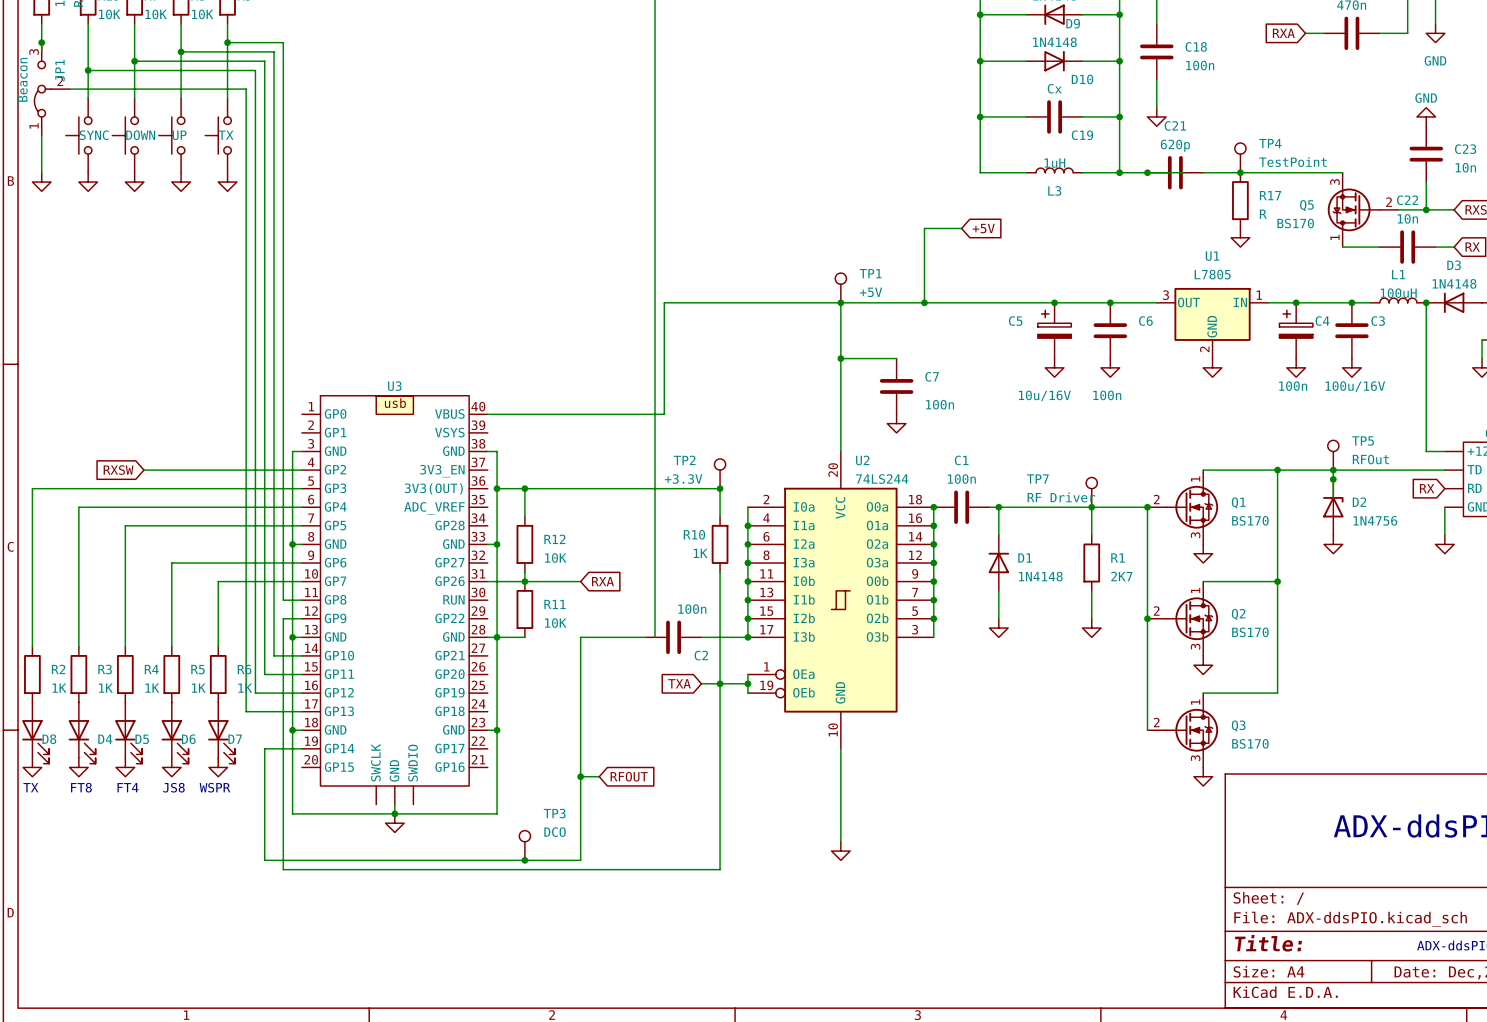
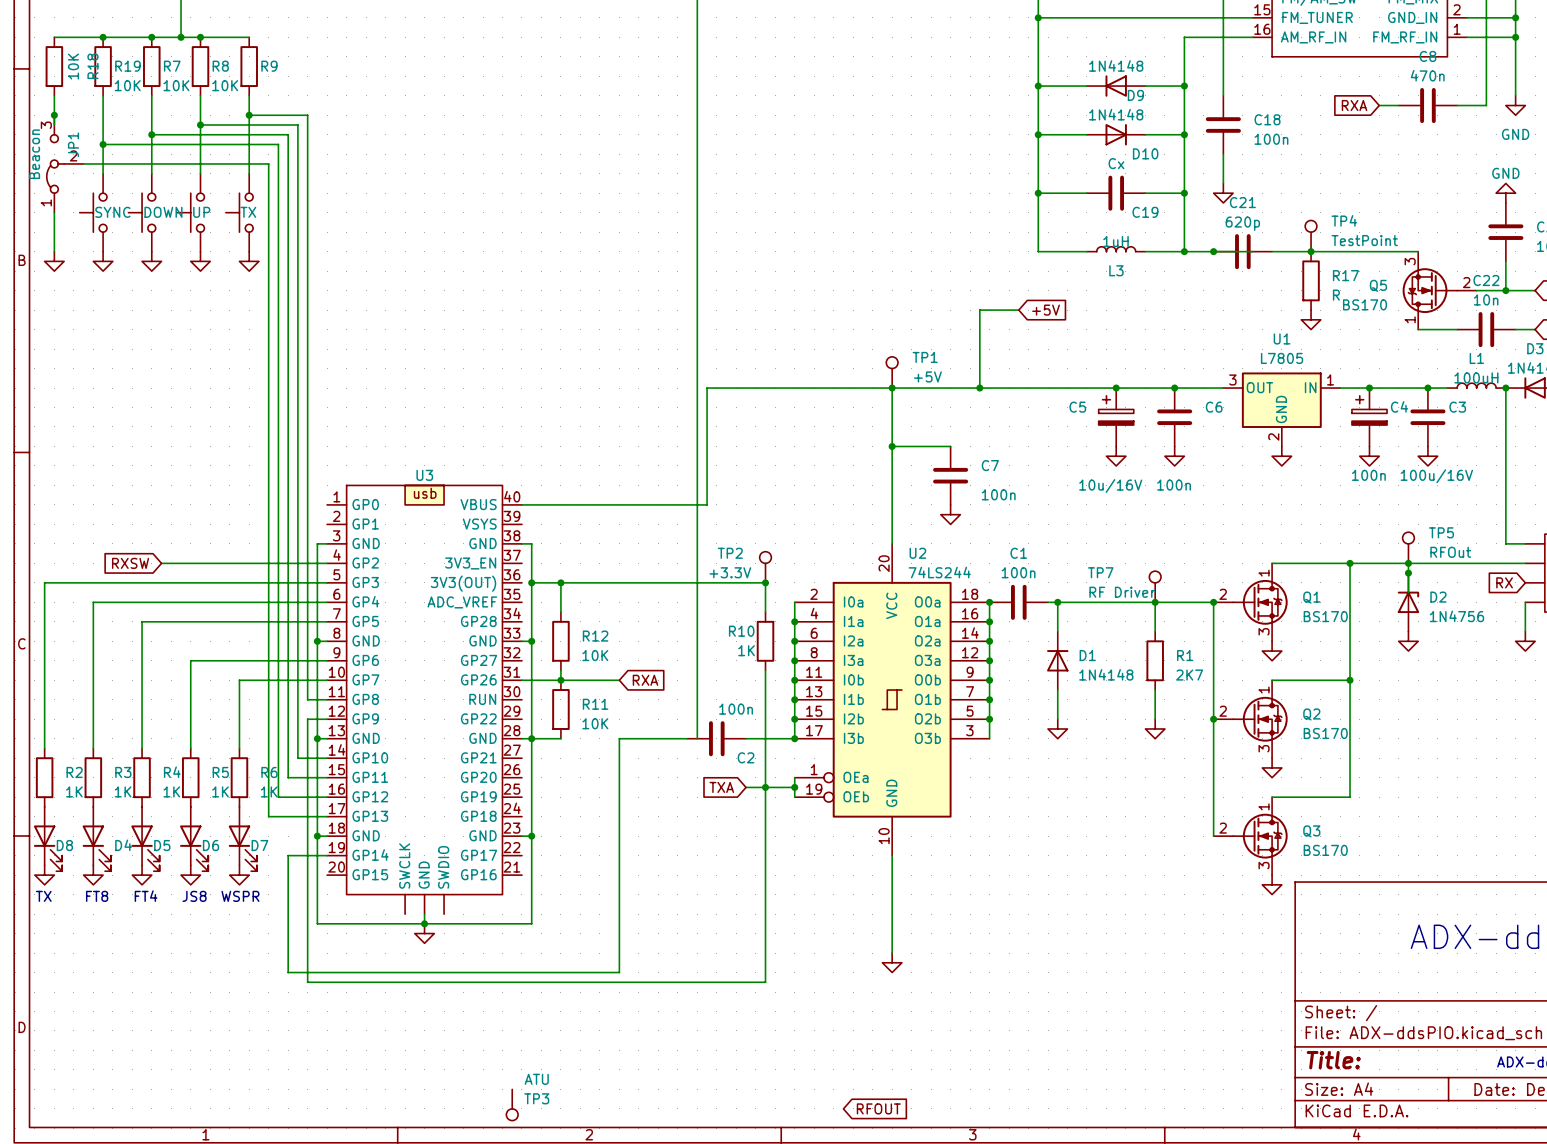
wire: (580, 776) (599, 776) -> none
junction: (580, 776) -> none
global label: RFOUT (629, 776) -> none
TP3 name position: TP3 (554, 813) -> TP3 (536, 1098)
TP3 value: DCO (555, 832) -> ATU (536, 1079)
TP3 rotation: 0° (524, 836) -> 180° (512, 1114)
TP3 position: (524, 845) -> (512, 1105)
junction: (524, 860) -> none
global label: none -> RFOUT (878, 1108)

